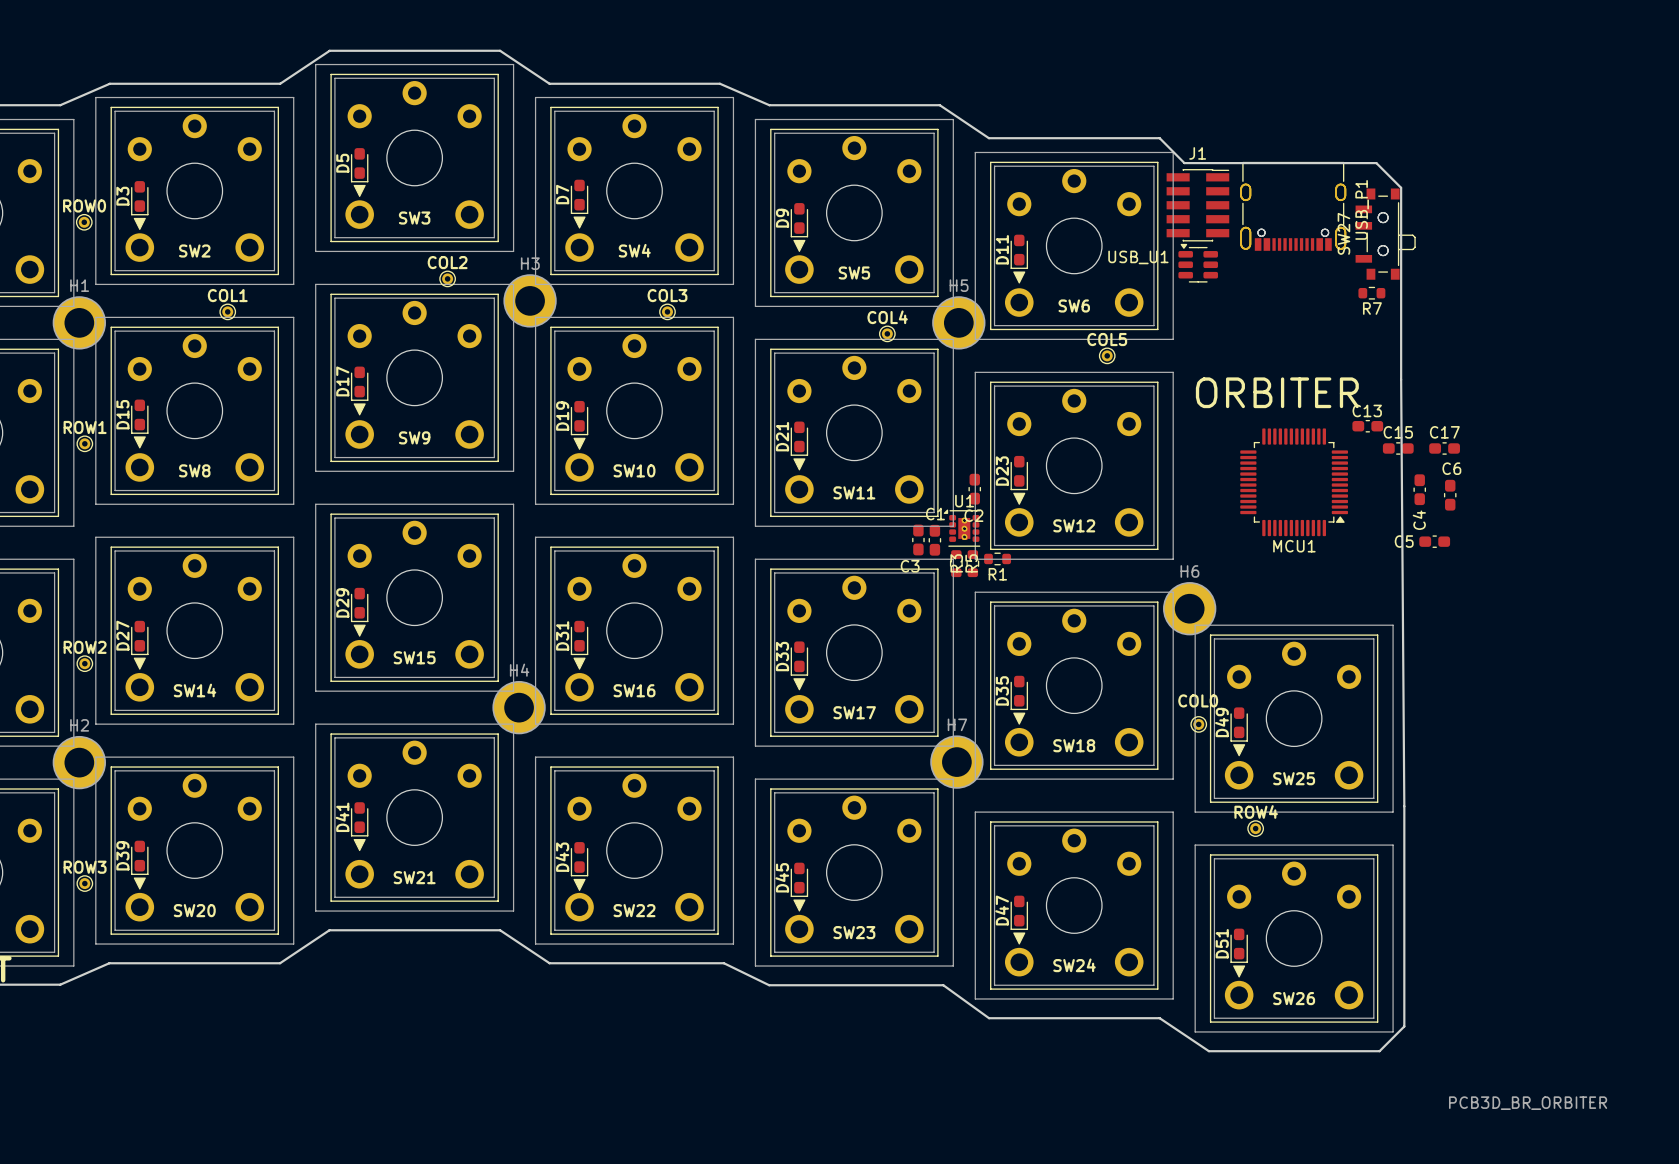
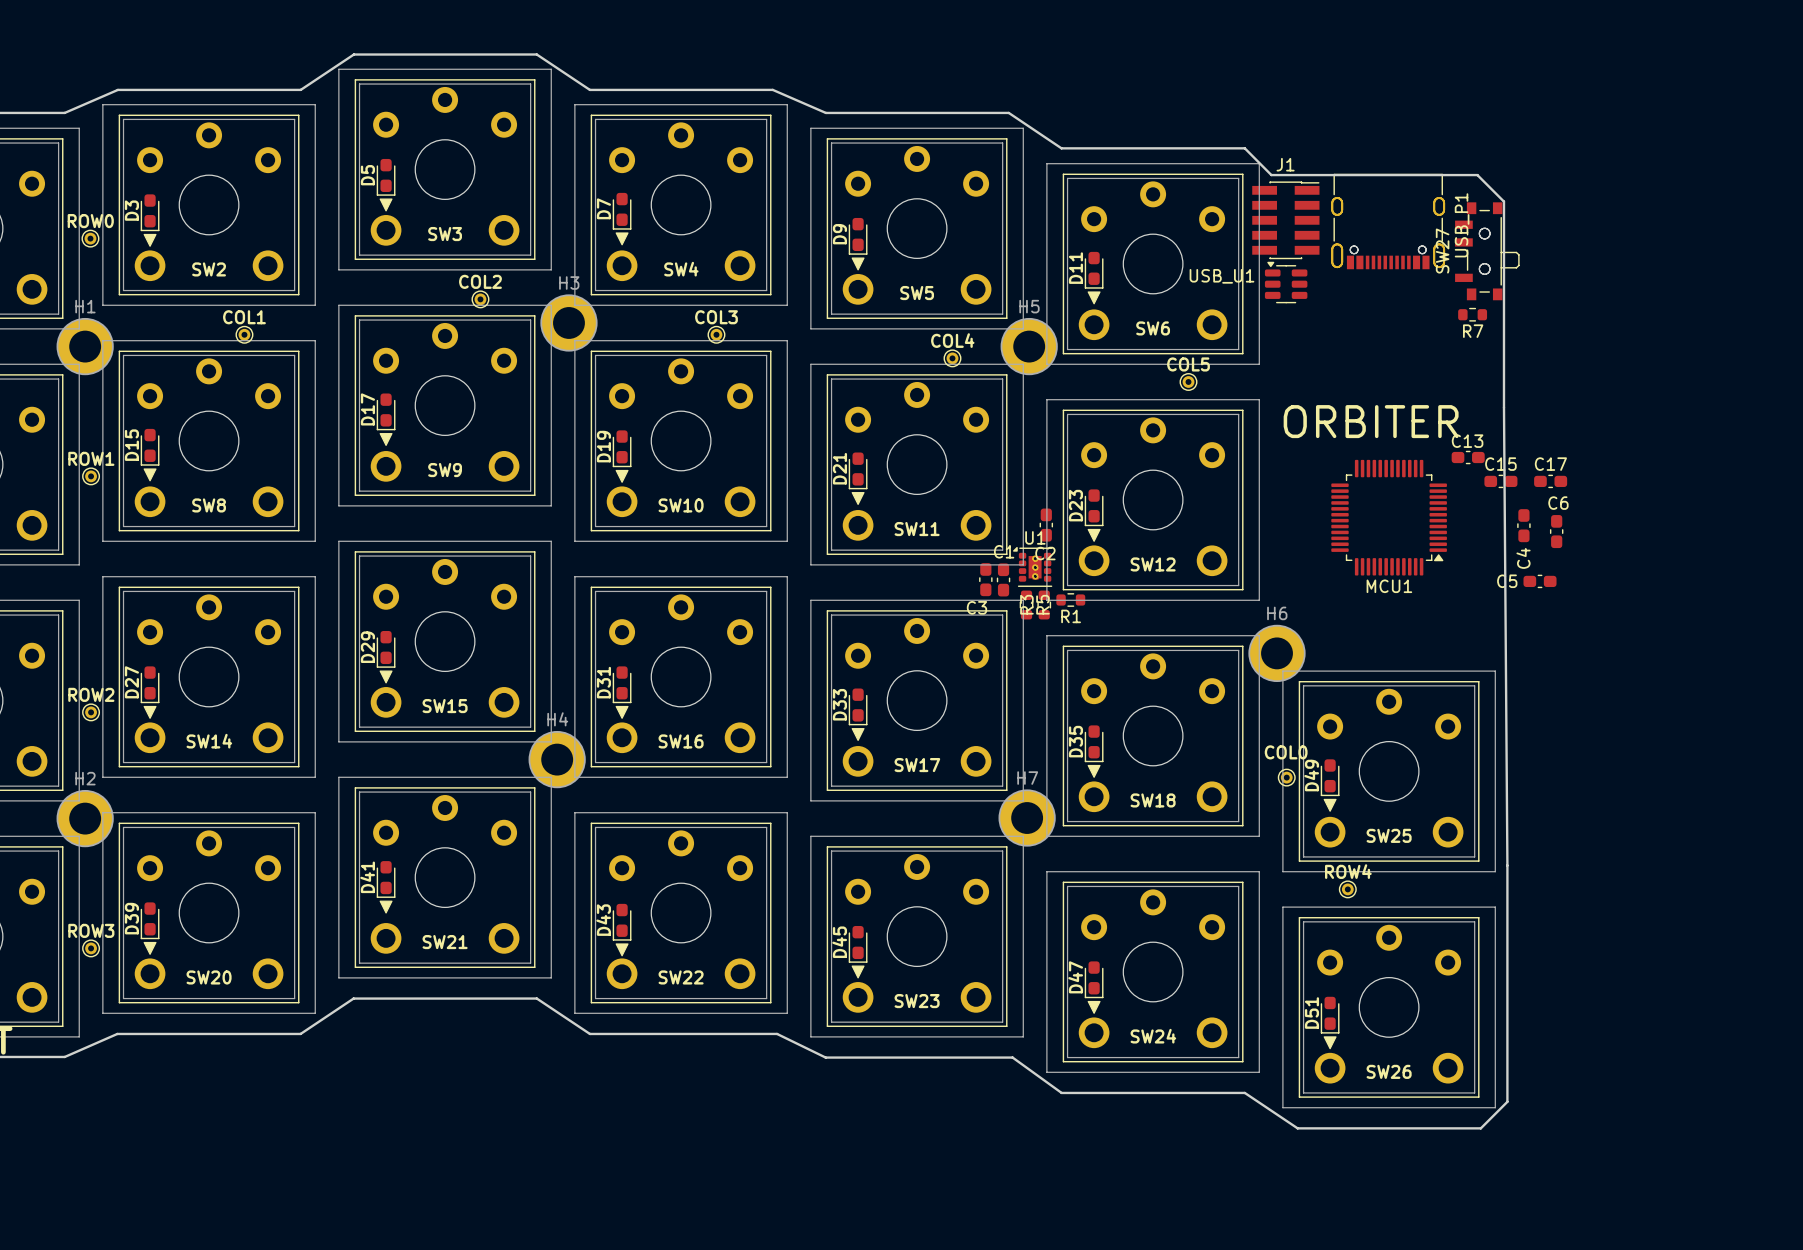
text: PCB3D_BR_ORBITER (1528, 1103) -> none

